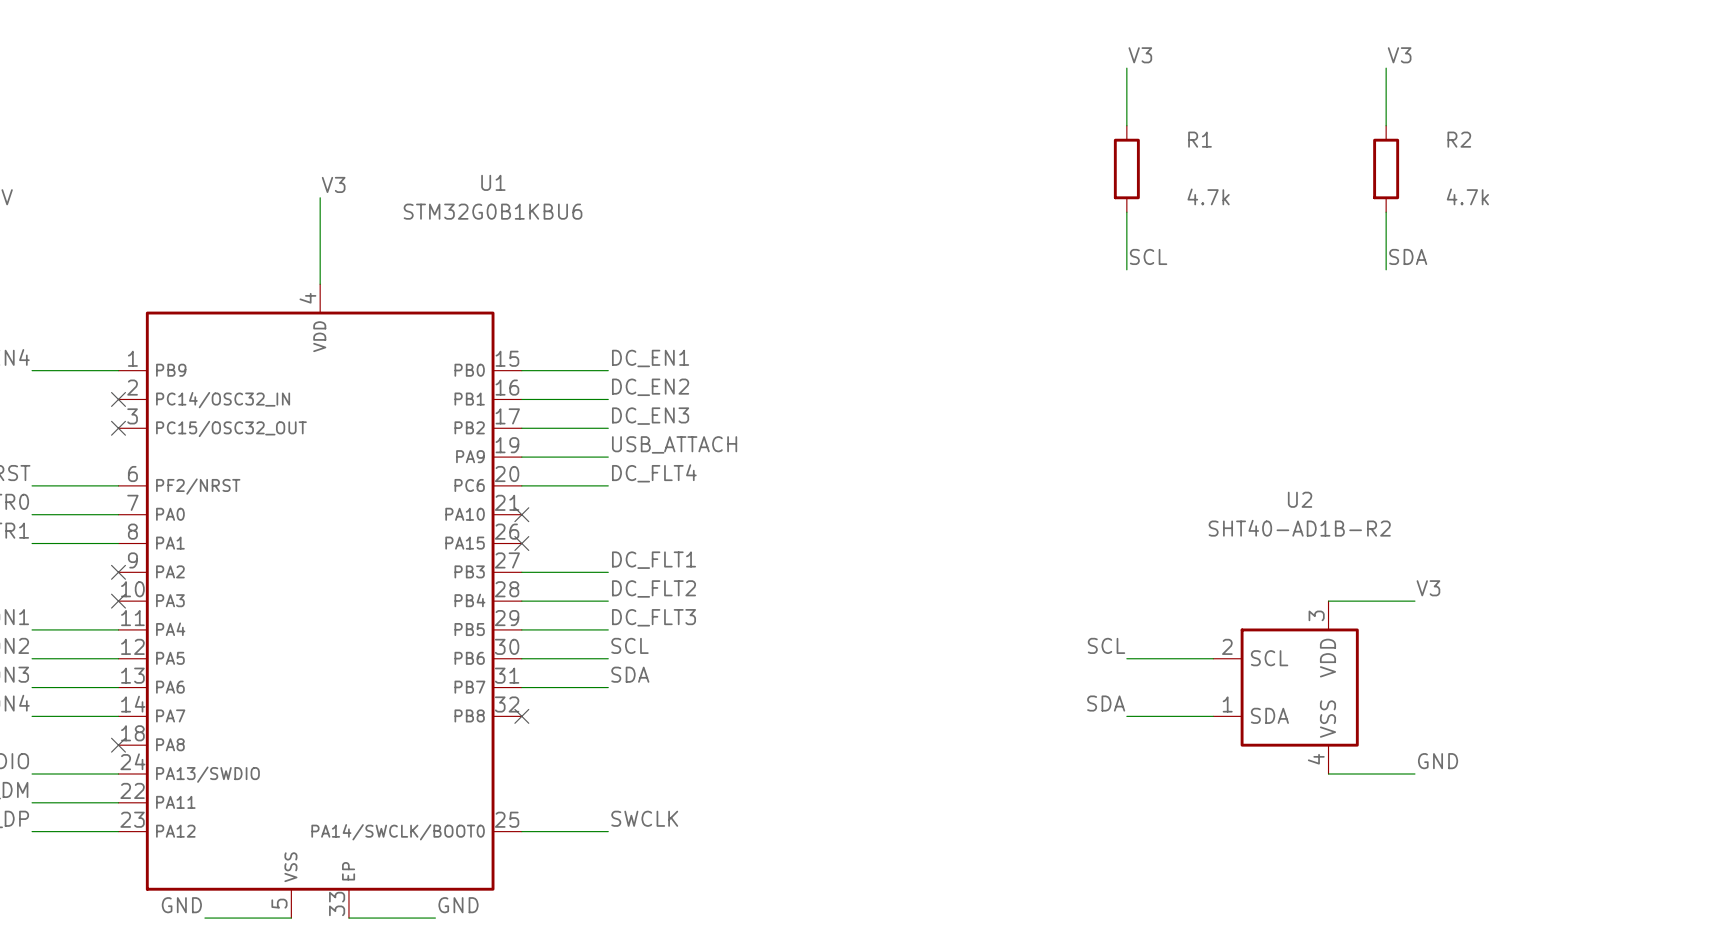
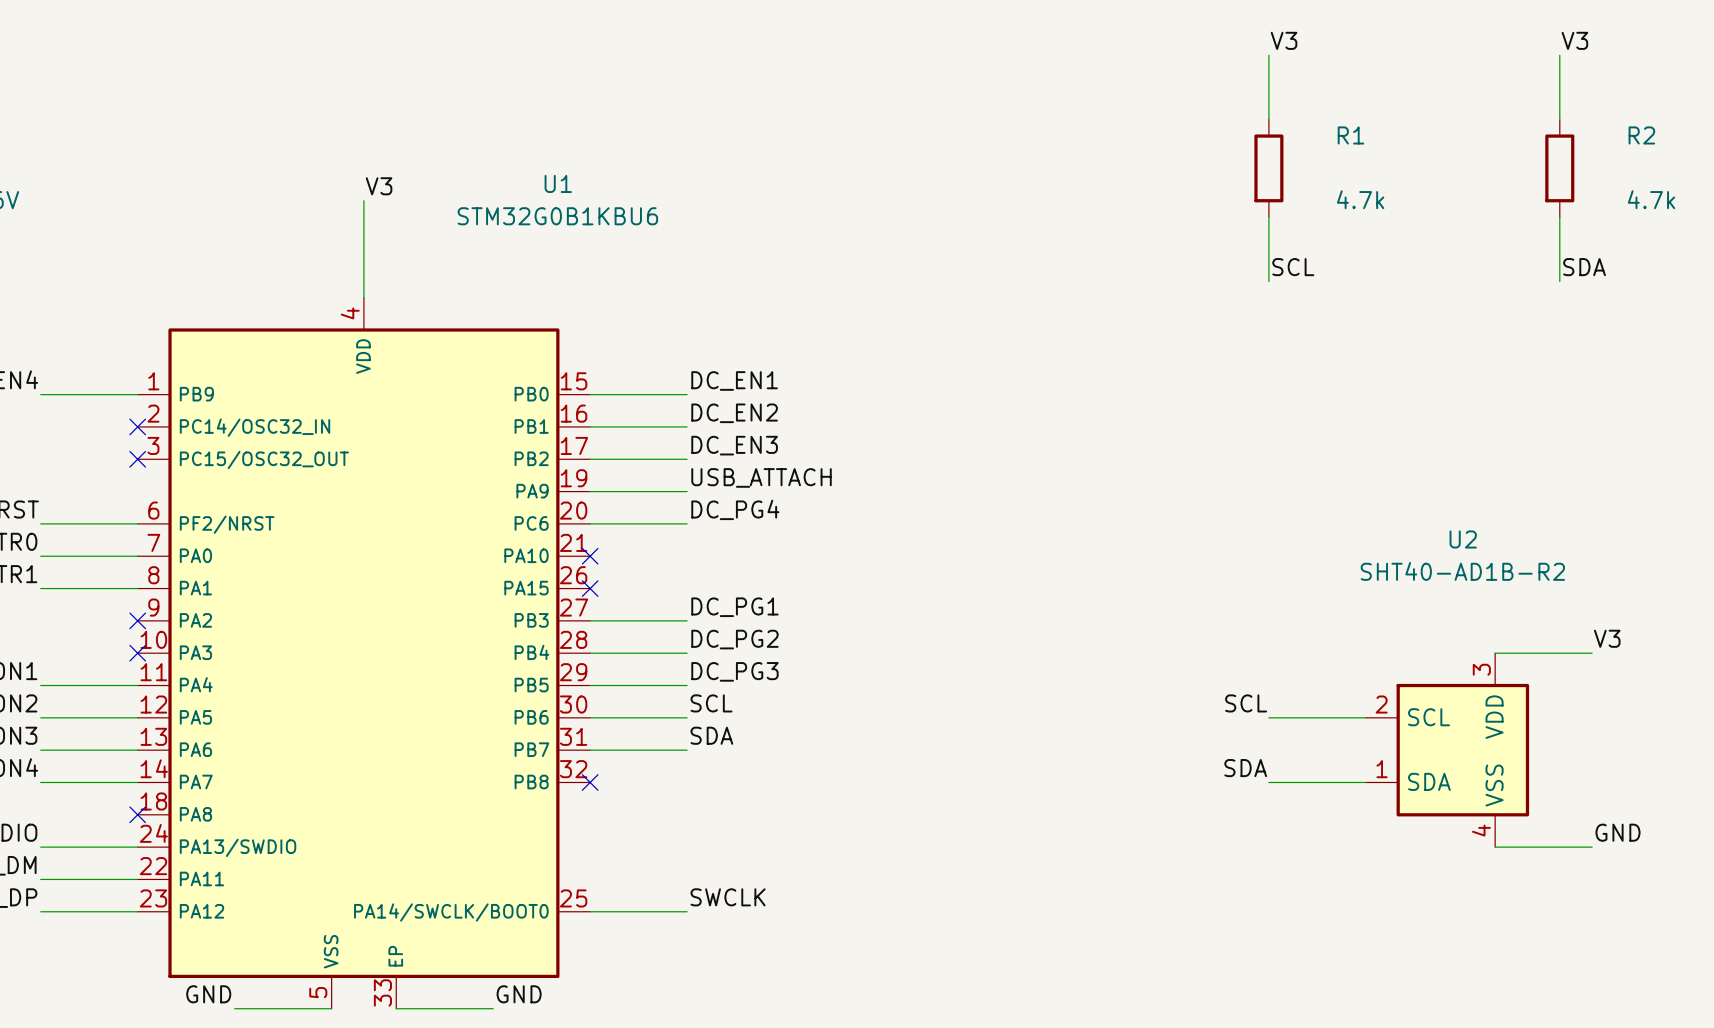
label: DC_FLT4 (654, 473) -> DC_PG4 (735, 509)
label: DC_FLT1 (653, 560) -> DC_PG1 (734, 607)
label: DC_FLT2 (653, 588) -> DC_PG2 (734, 639)
label: DC_FLT3 (653, 617) -> DC_PG3 (734, 671)

